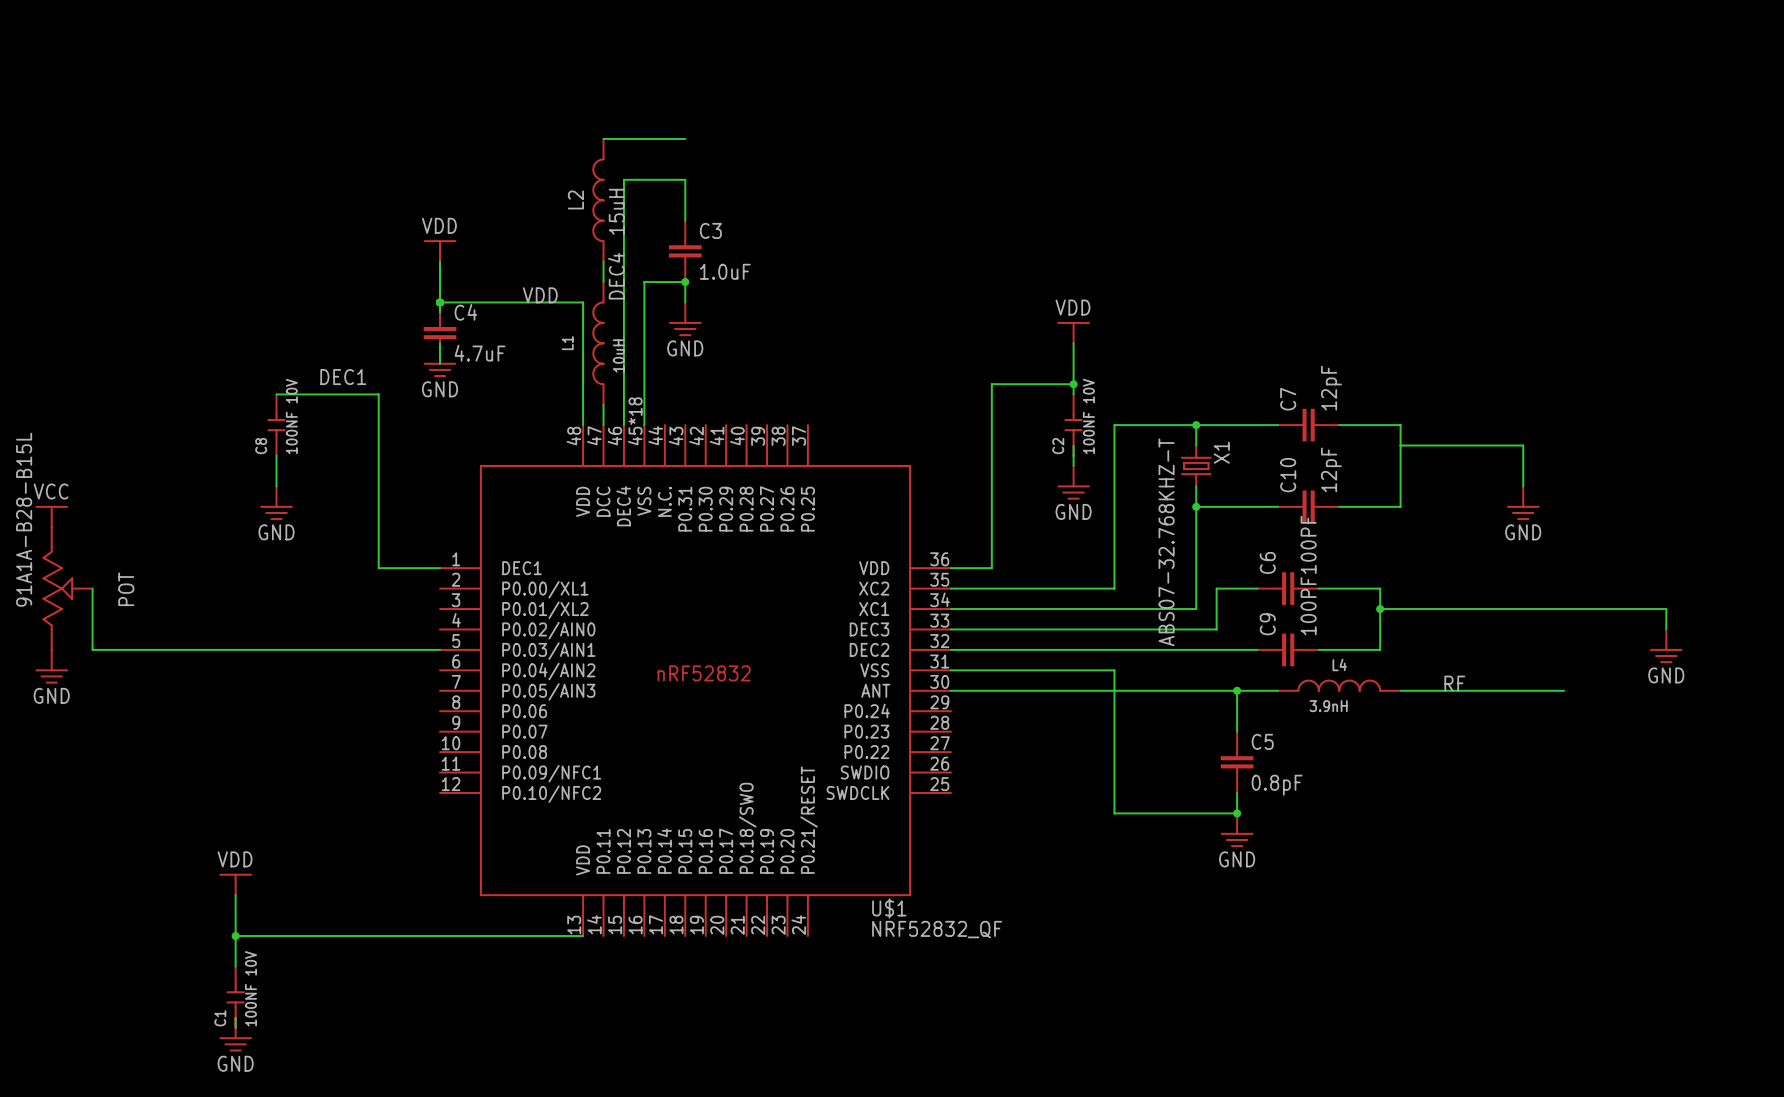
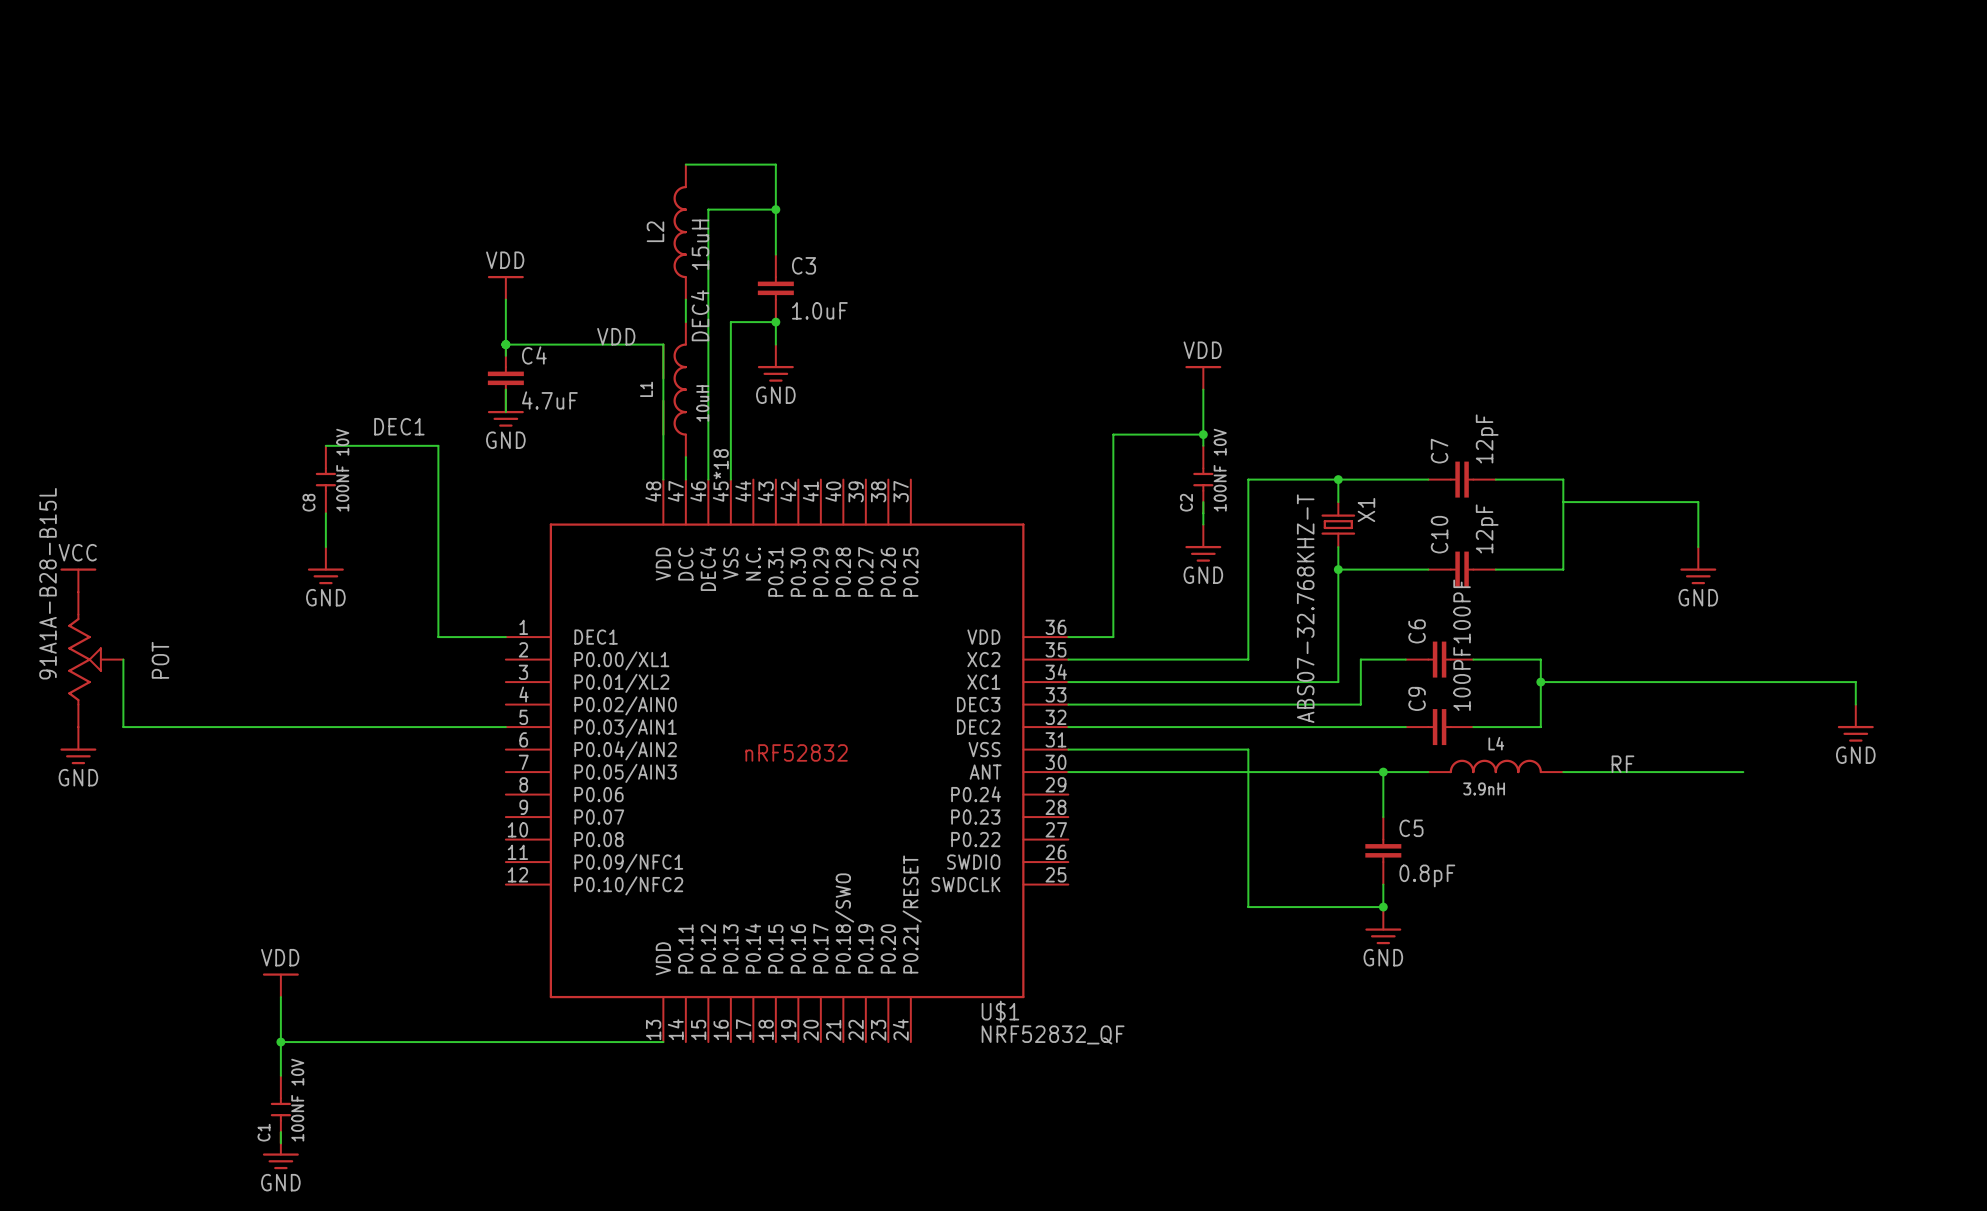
wire: none -> (775, 164) (775, 209)
junction: none -> (775, 209)

